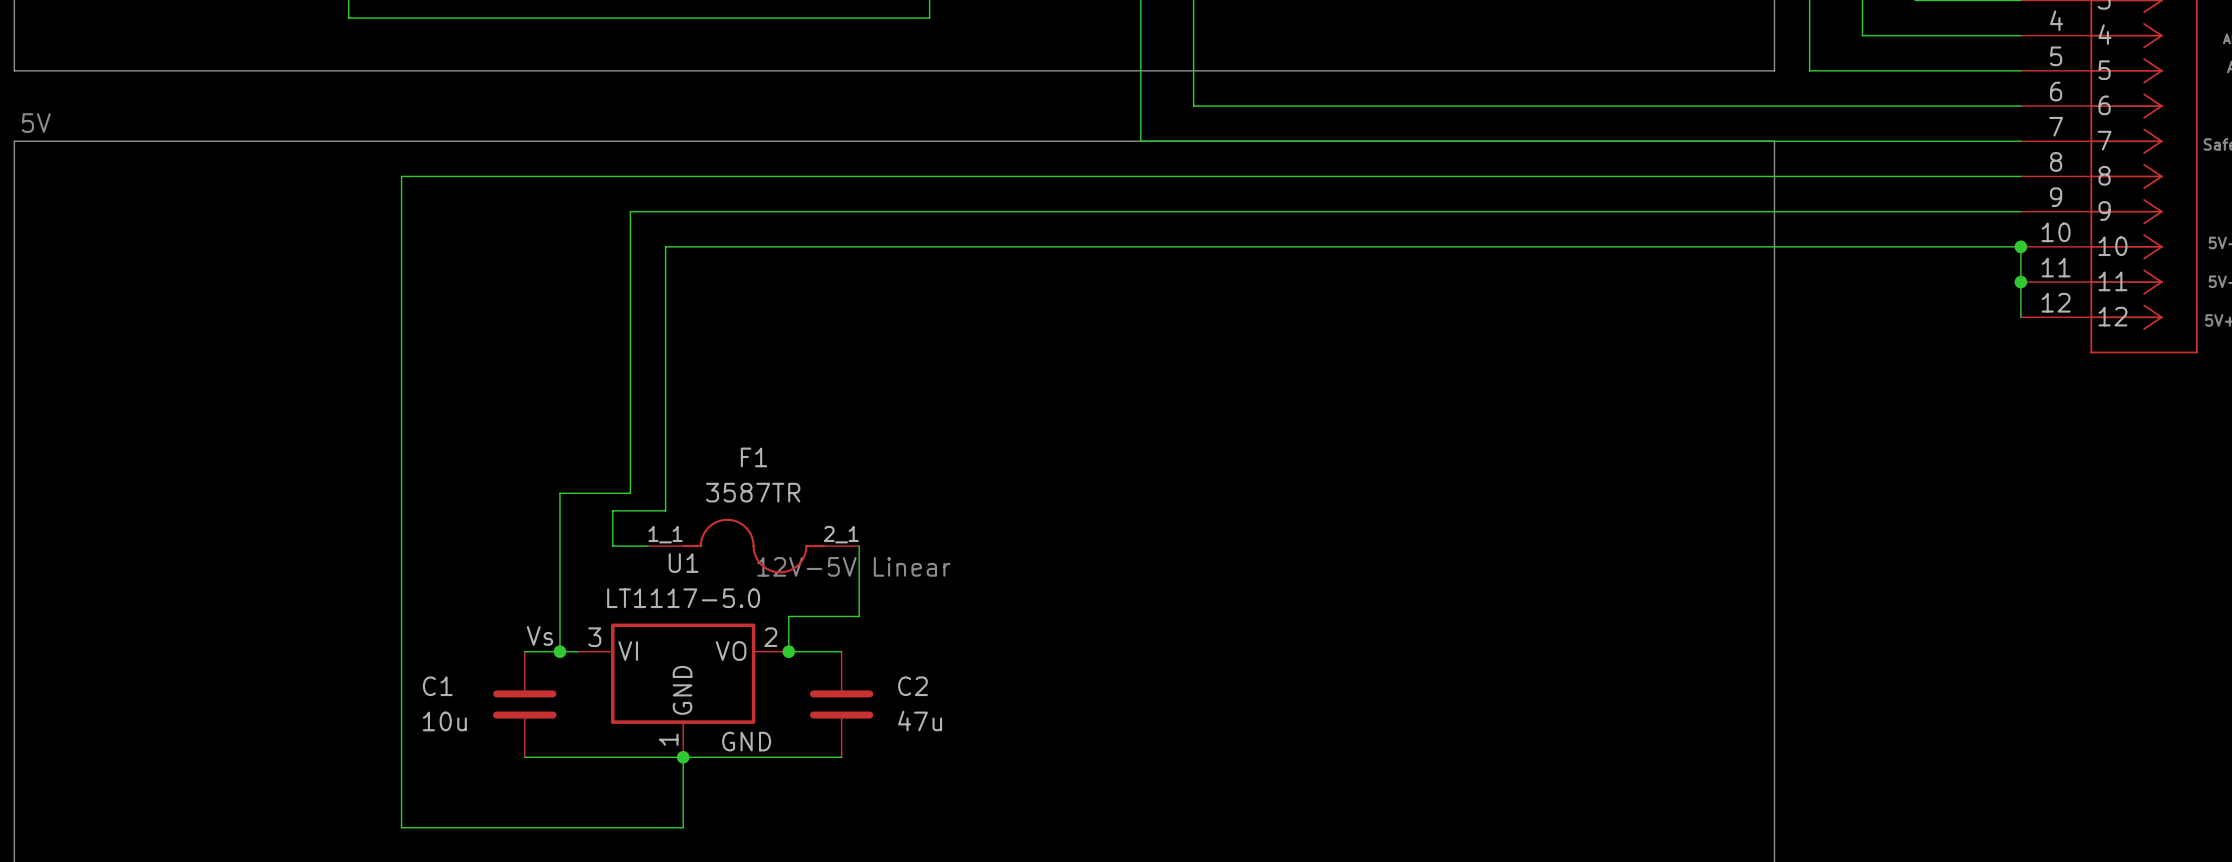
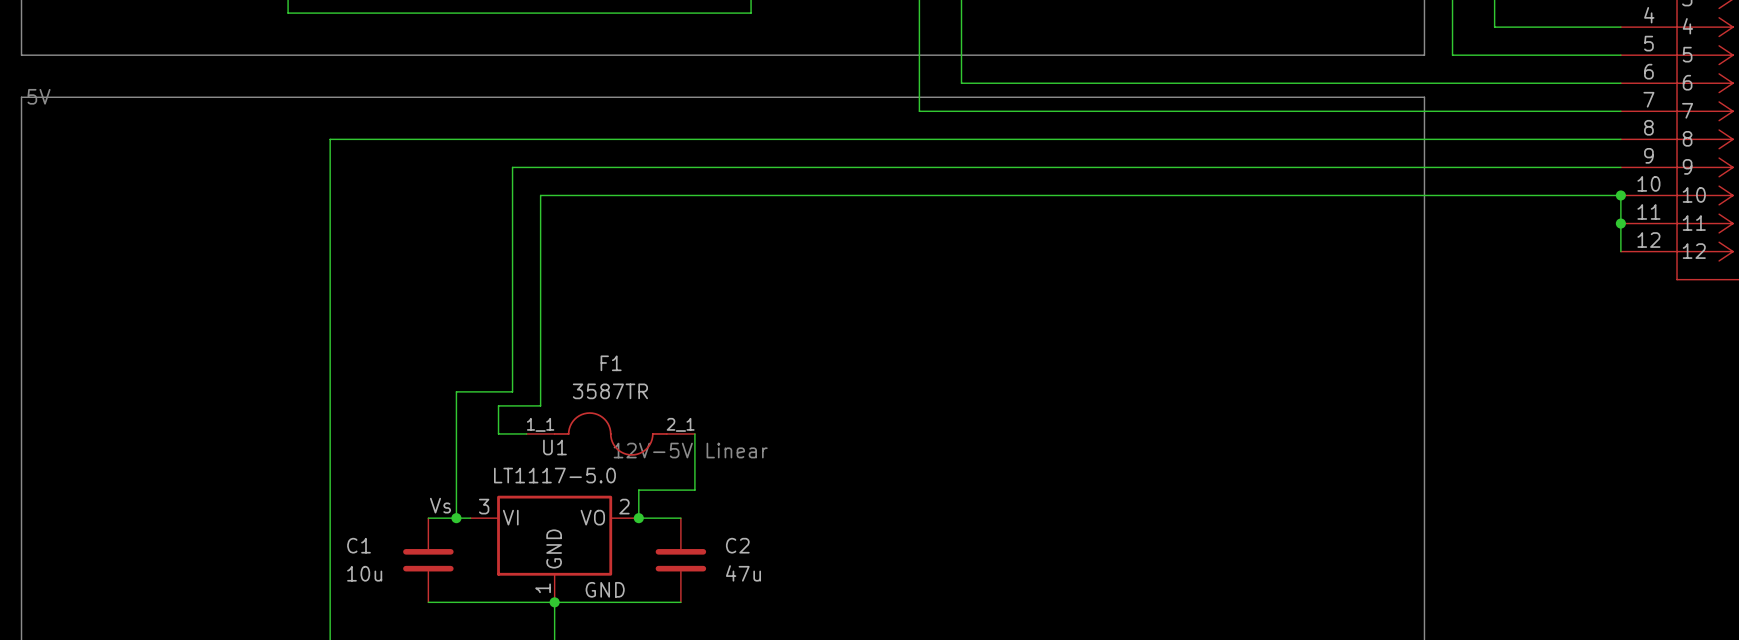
line: (14, 141) (1774, 141) -> (21, 111) (21, 97) (1424, 97) (1424, 111)

